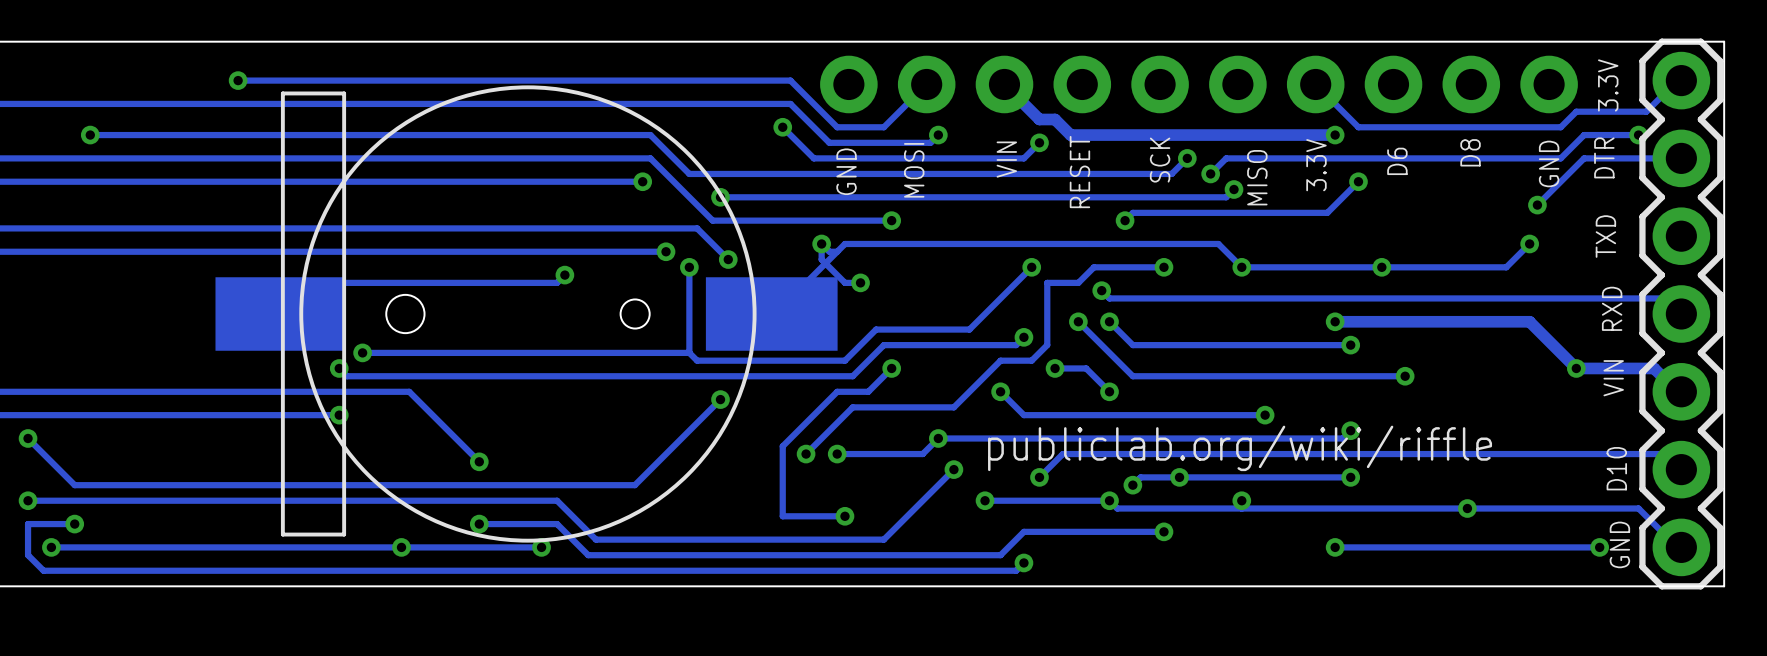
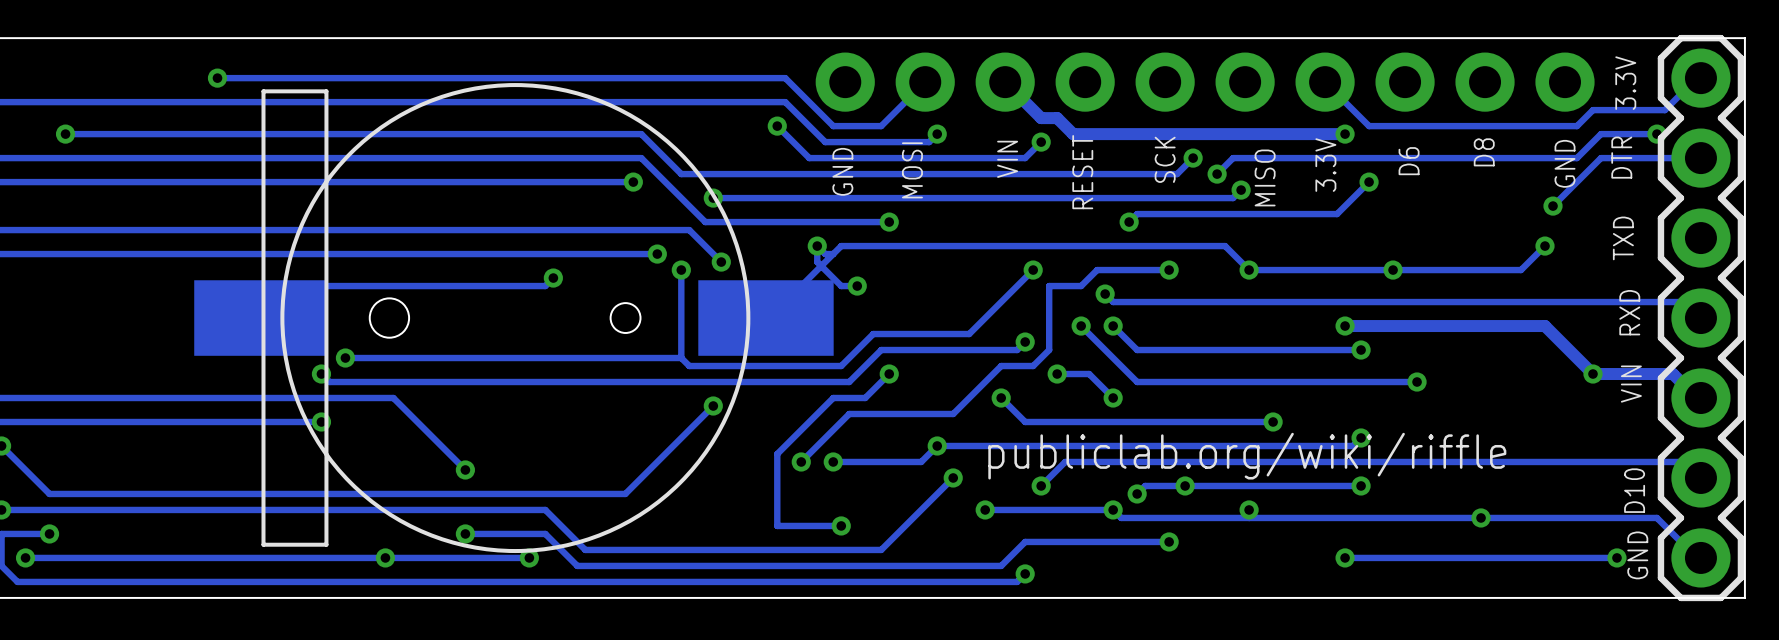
text position: D10 (1616, 468) -> D10 (1634, 490)

